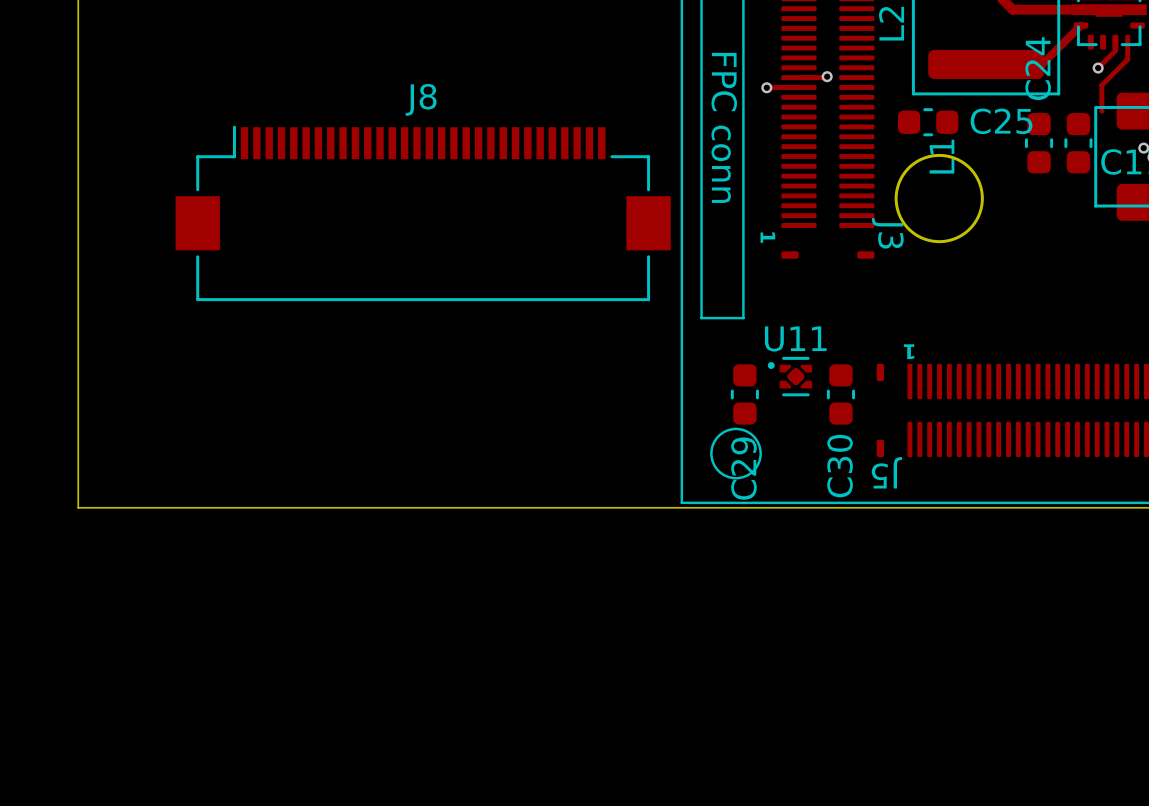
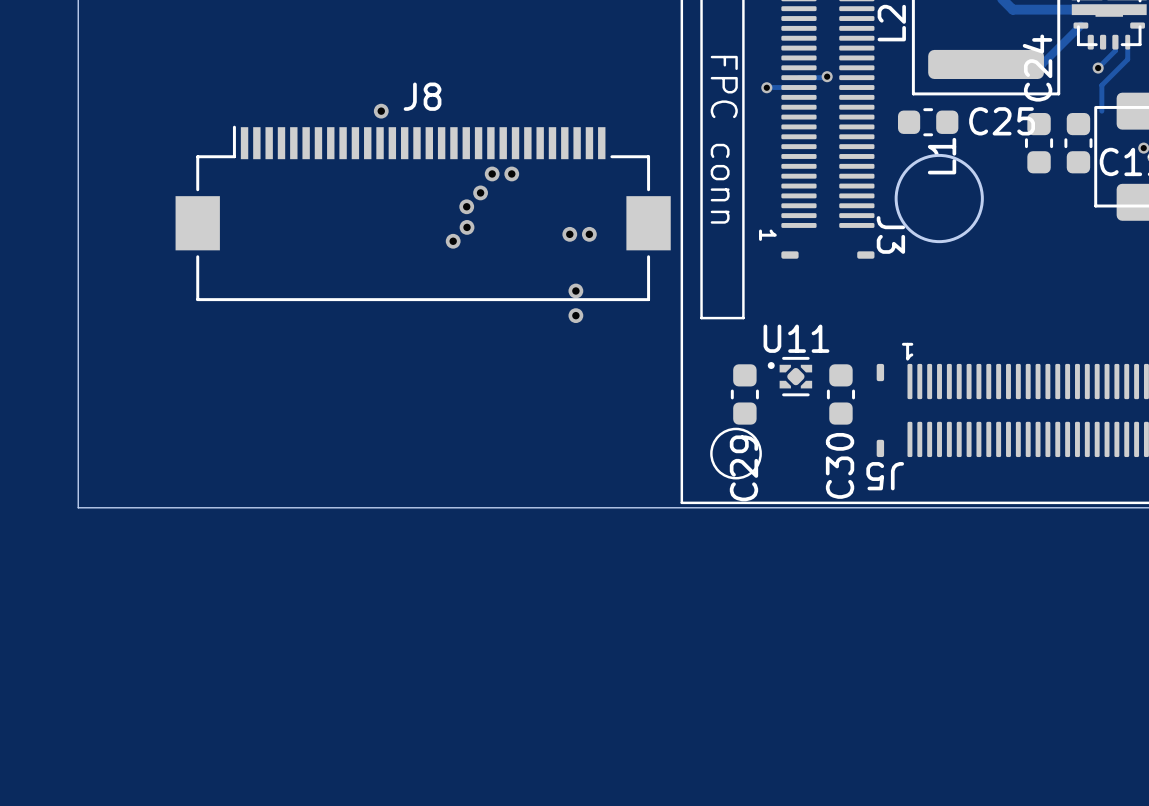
via: none -> (381, 111)
via: none -> (492, 173)
via: none -> (511, 173)
via: none -> (480, 192)
via: none -> (466, 206)
via: none -> (467, 227)
via: none -> (569, 234)
via: none -> (589, 234)
via: none -> (453, 241)
via: none -> (575, 290)
via: none -> (575, 315)

